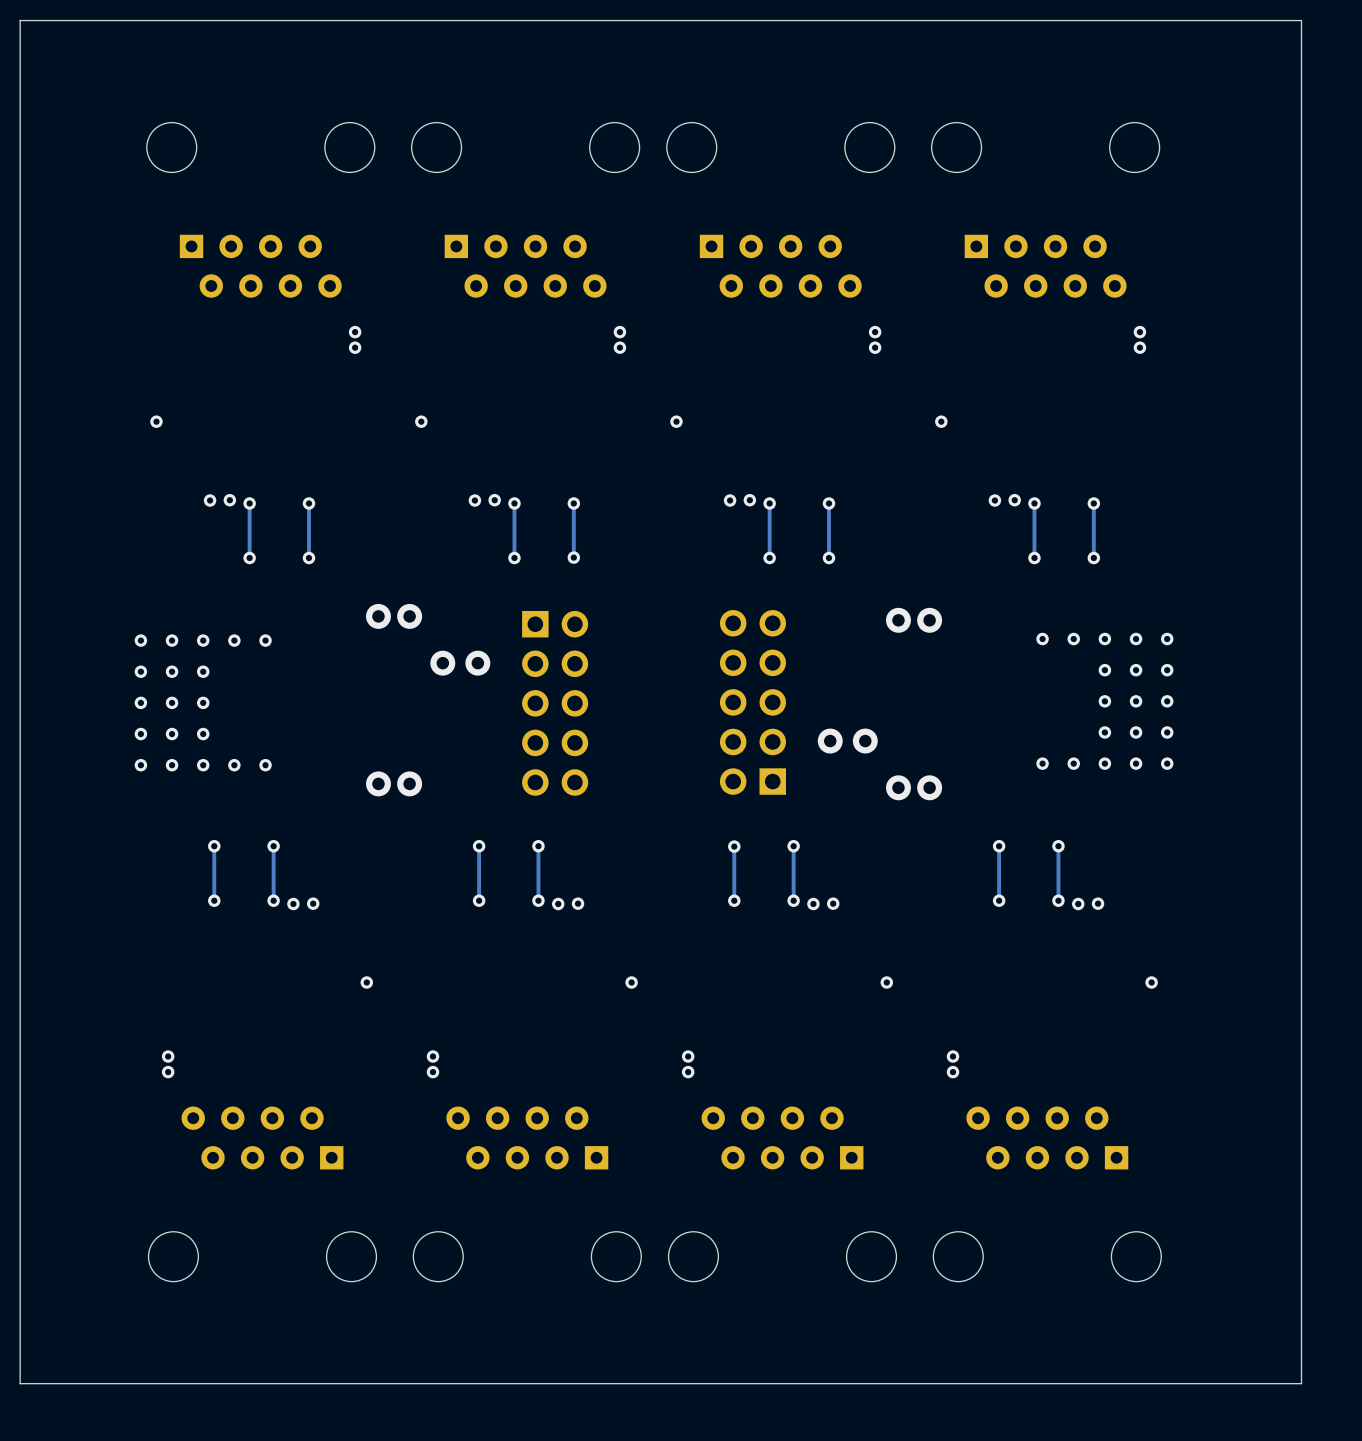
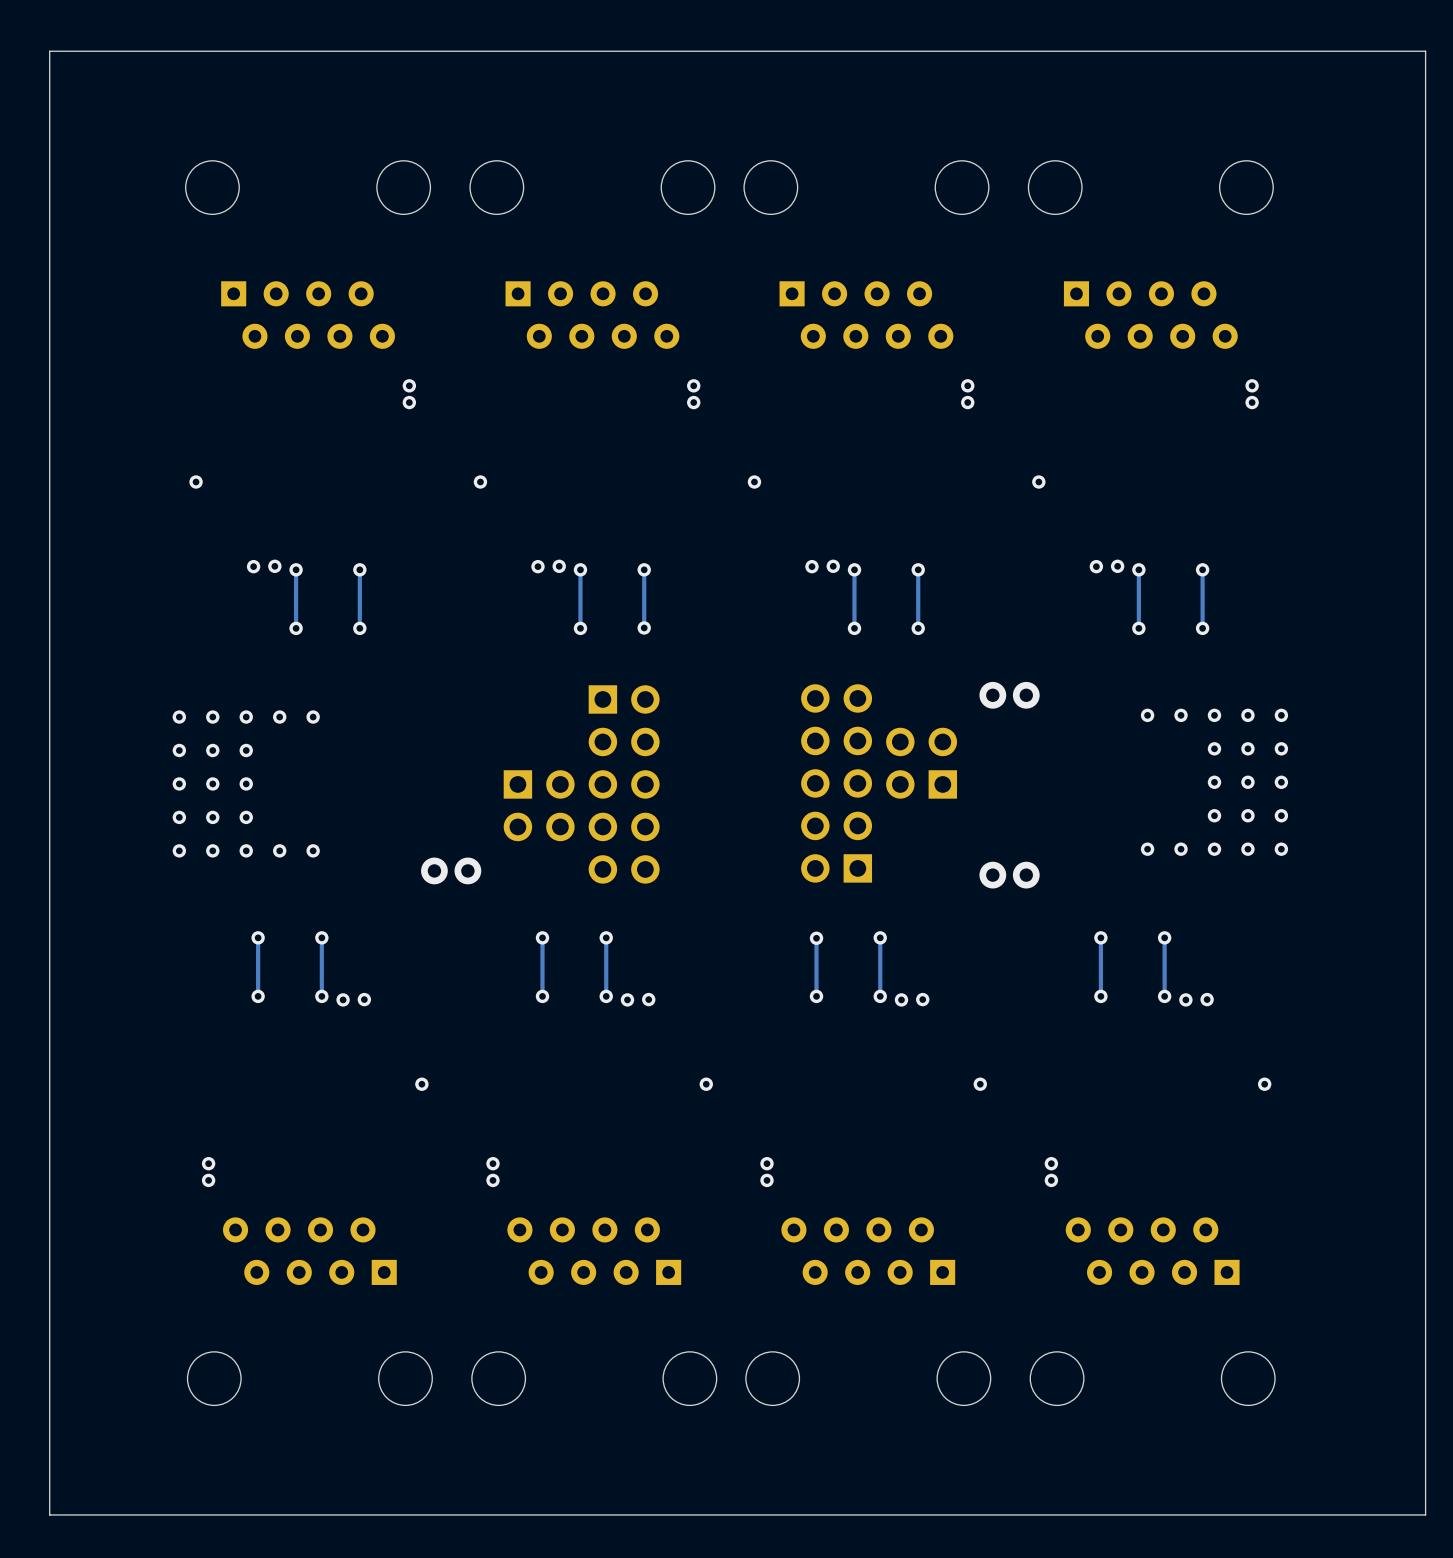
via: (378, 616) -> none
via: (409, 616) -> none
via: (442, 663) -> none
via: (477, 663) -> none
part: none -> (921, 763)
part: none -> (539, 805)
via: (830, 741) -> none
via: (865, 741) -> none

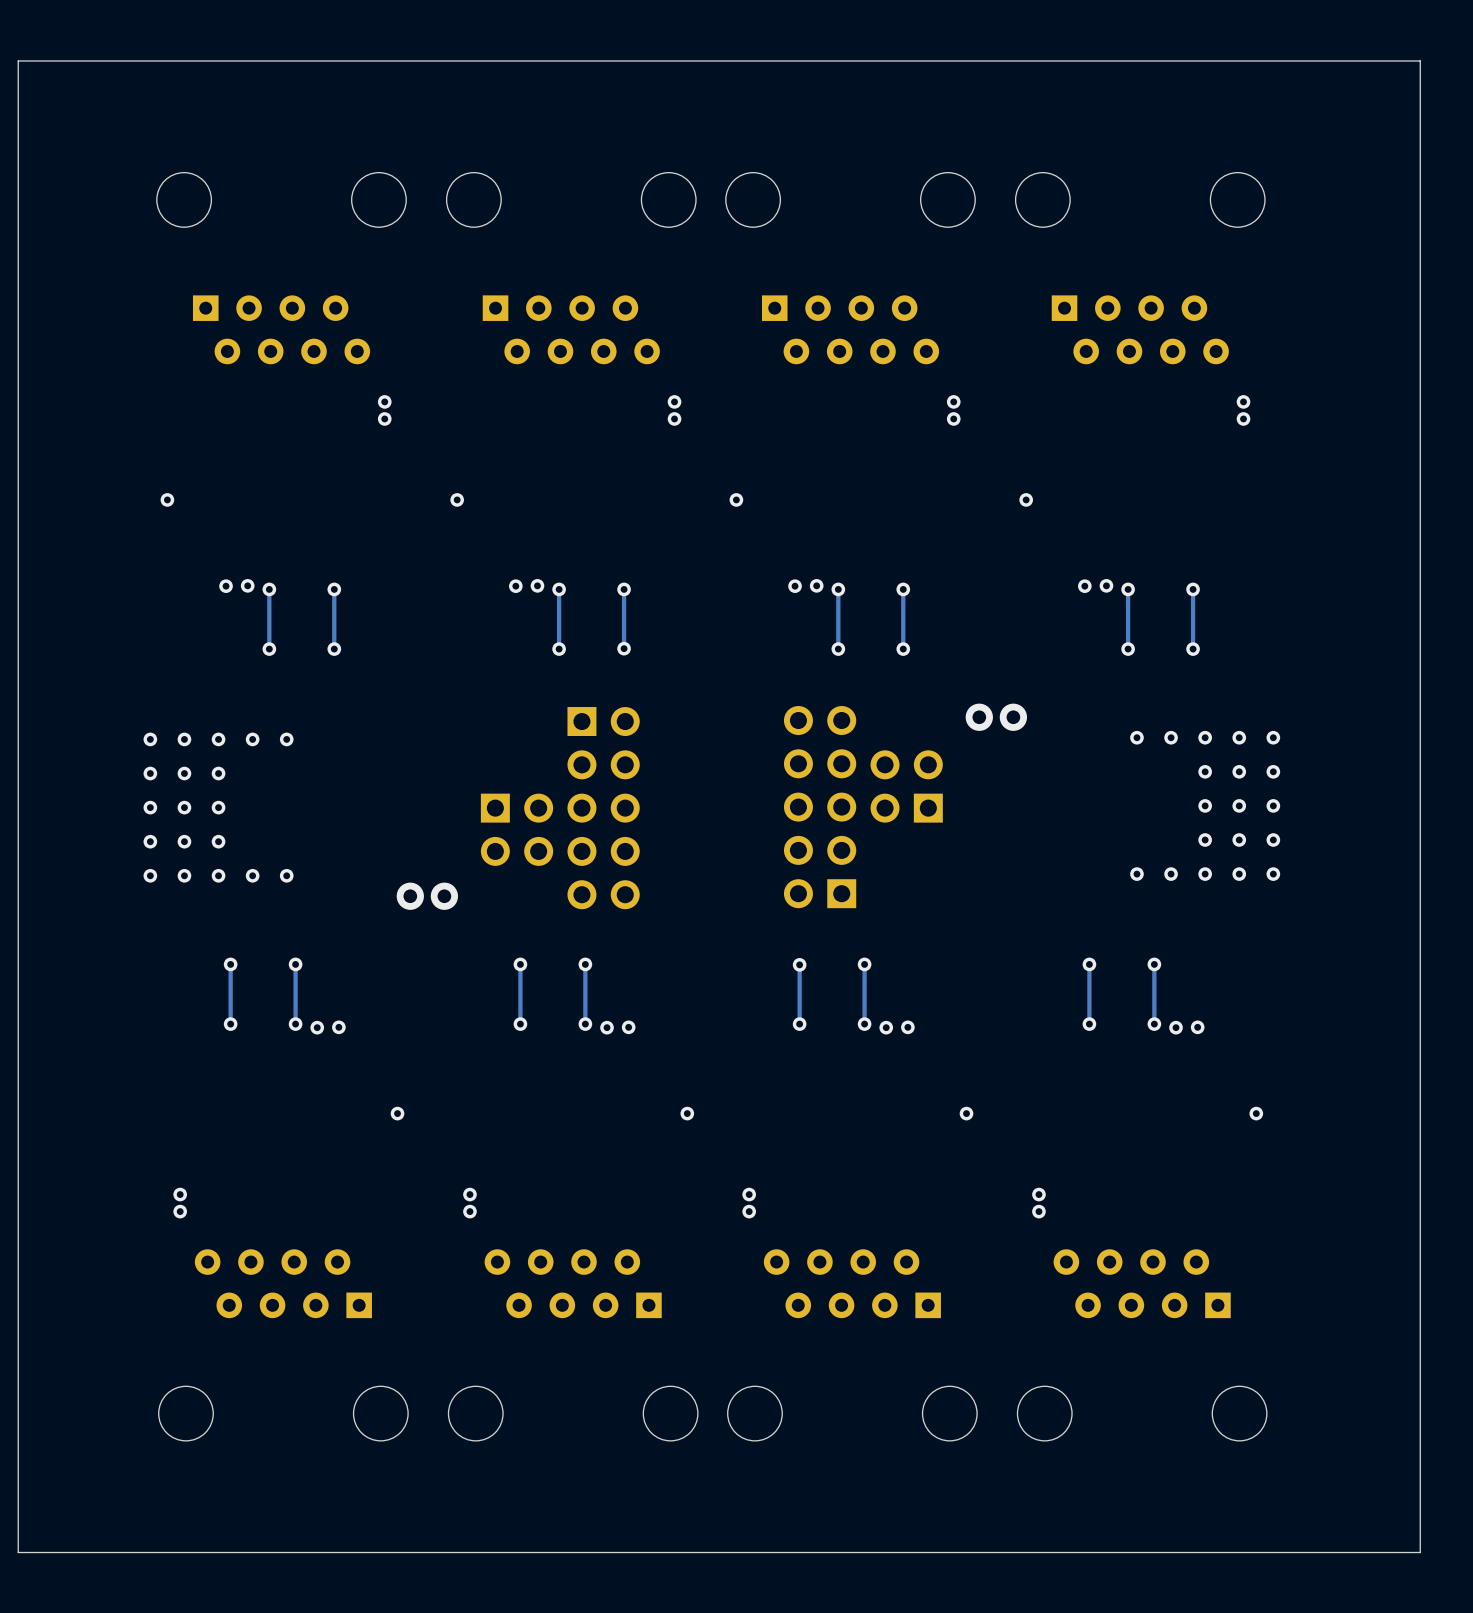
via: (992, 875) -> none
via: (1026, 875) -> none

